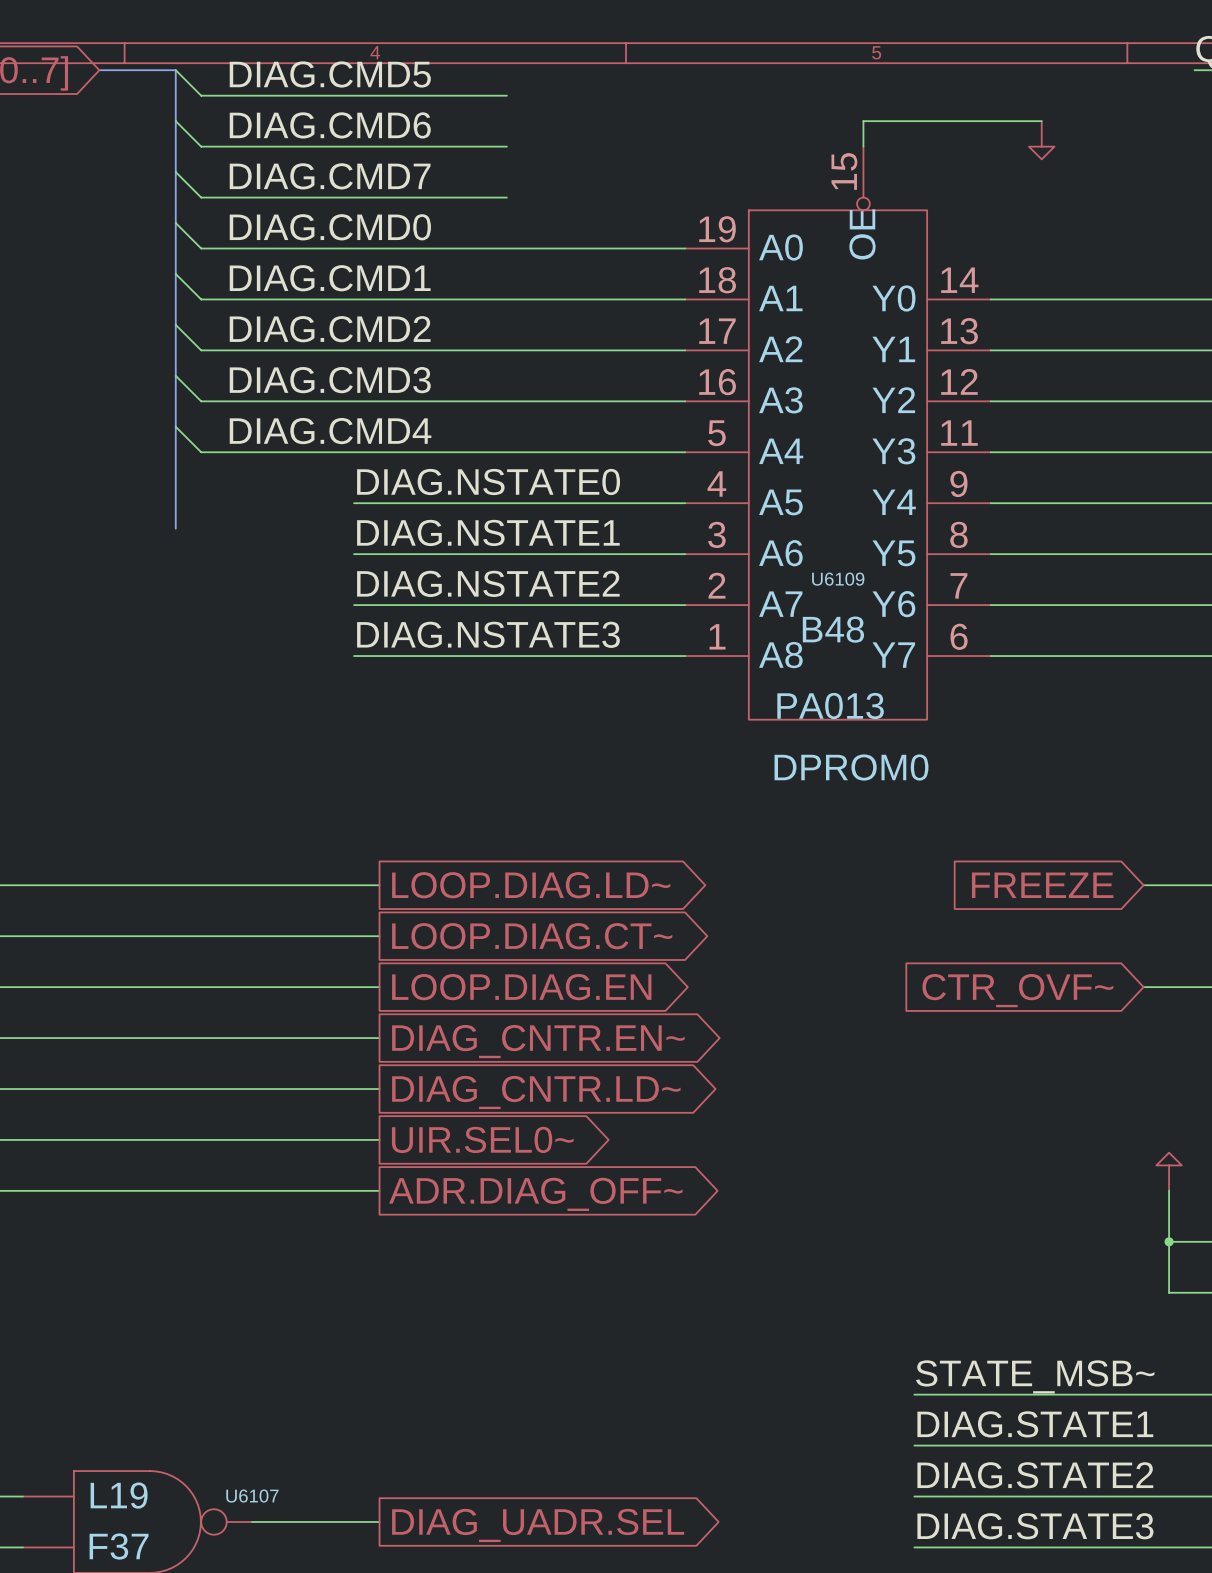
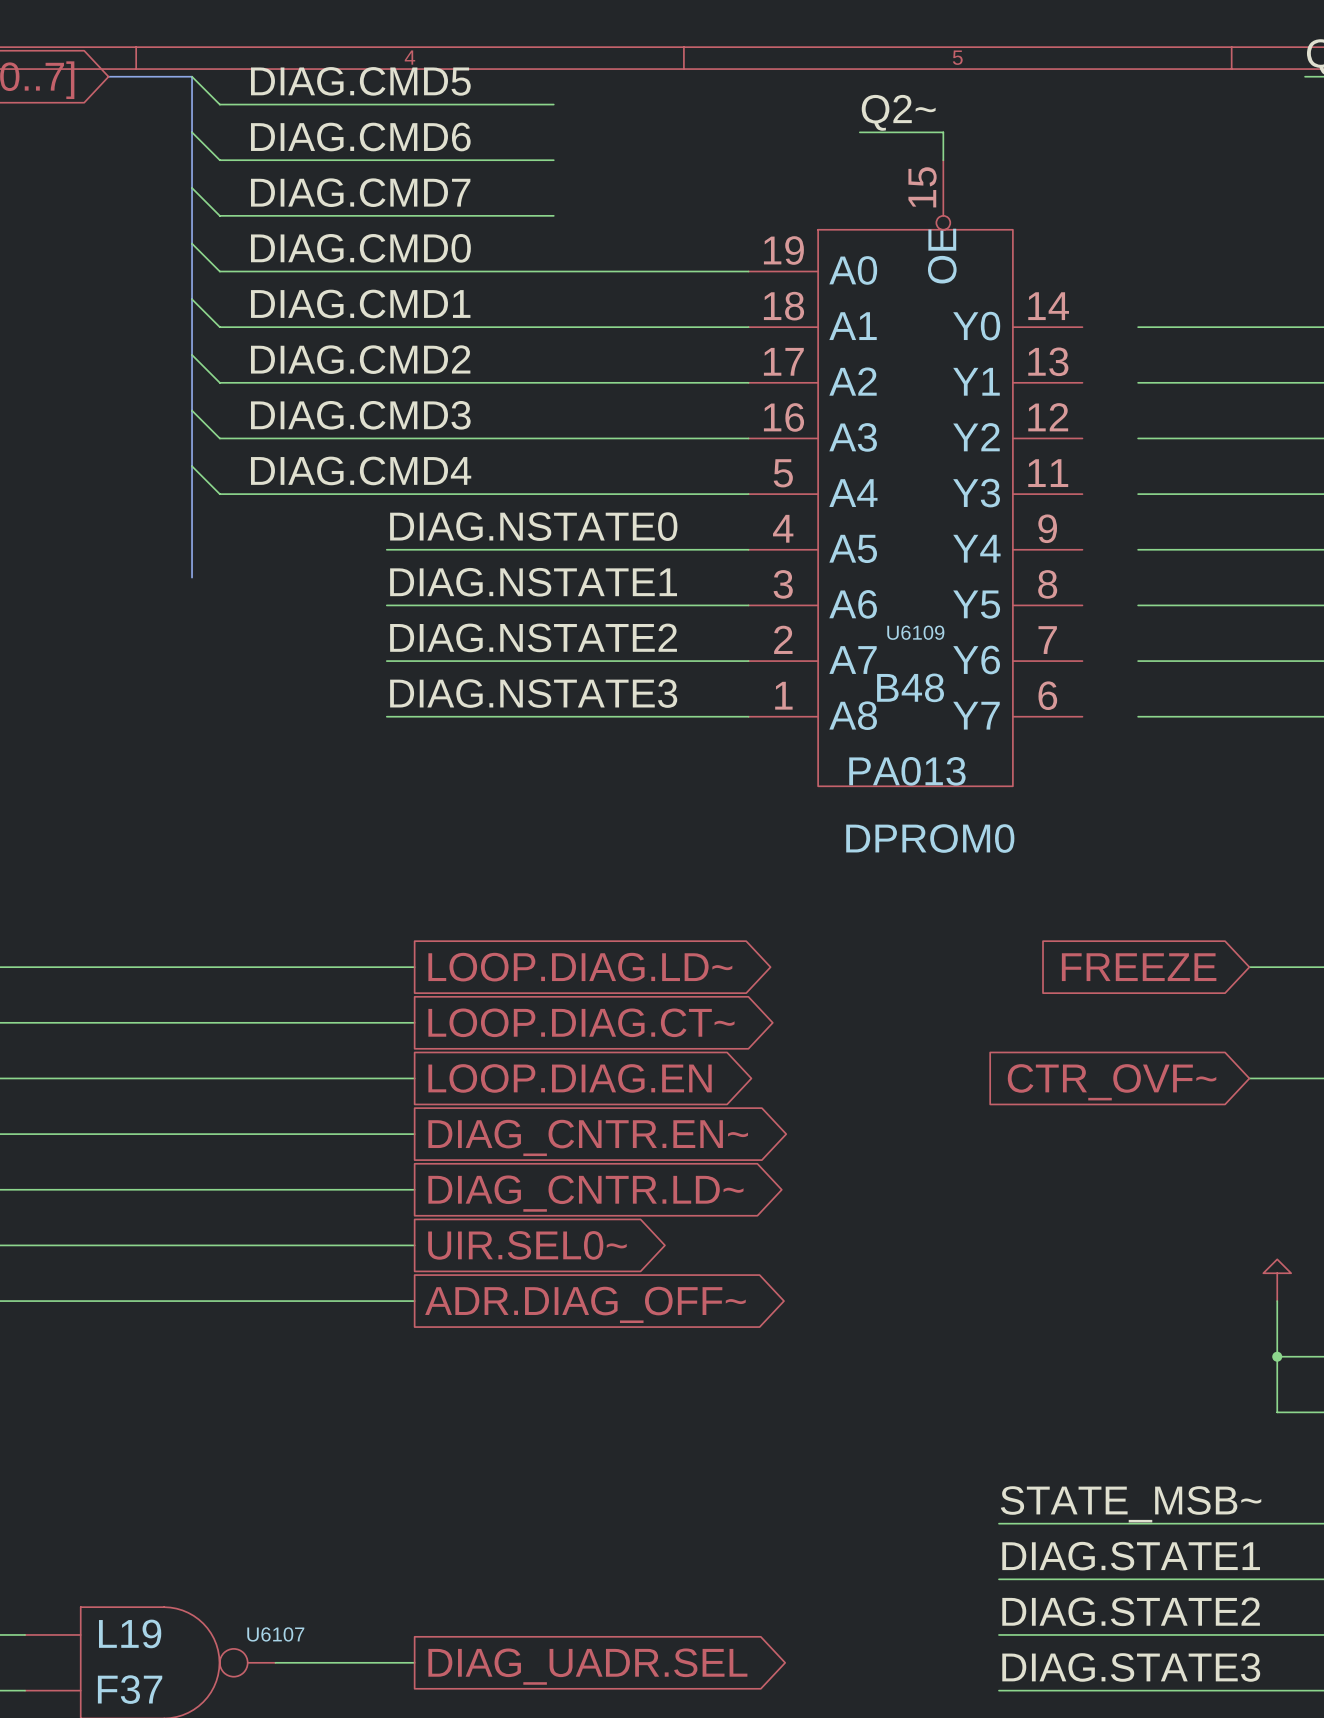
label: none -> Q2~ (898, 112)
wire: (863, 121) (1041, 121) -> (943, 132) (859, 132)
power symbol: (1041, 140) -> none
wire: (990, 299) (1041, 299) -> none
wire: (990, 350) (1041, 350) -> none
wire: (990, 401) (1041, 401) -> none
wire: (990, 452) (1041, 452) -> none
wire: (990, 503) (1041, 503) -> none
wire: (990, 554) (1041, 554) -> none
wire: (990, 605) (1041, 605) -> none
wire: (990, 656) (1041, 656) -> none

